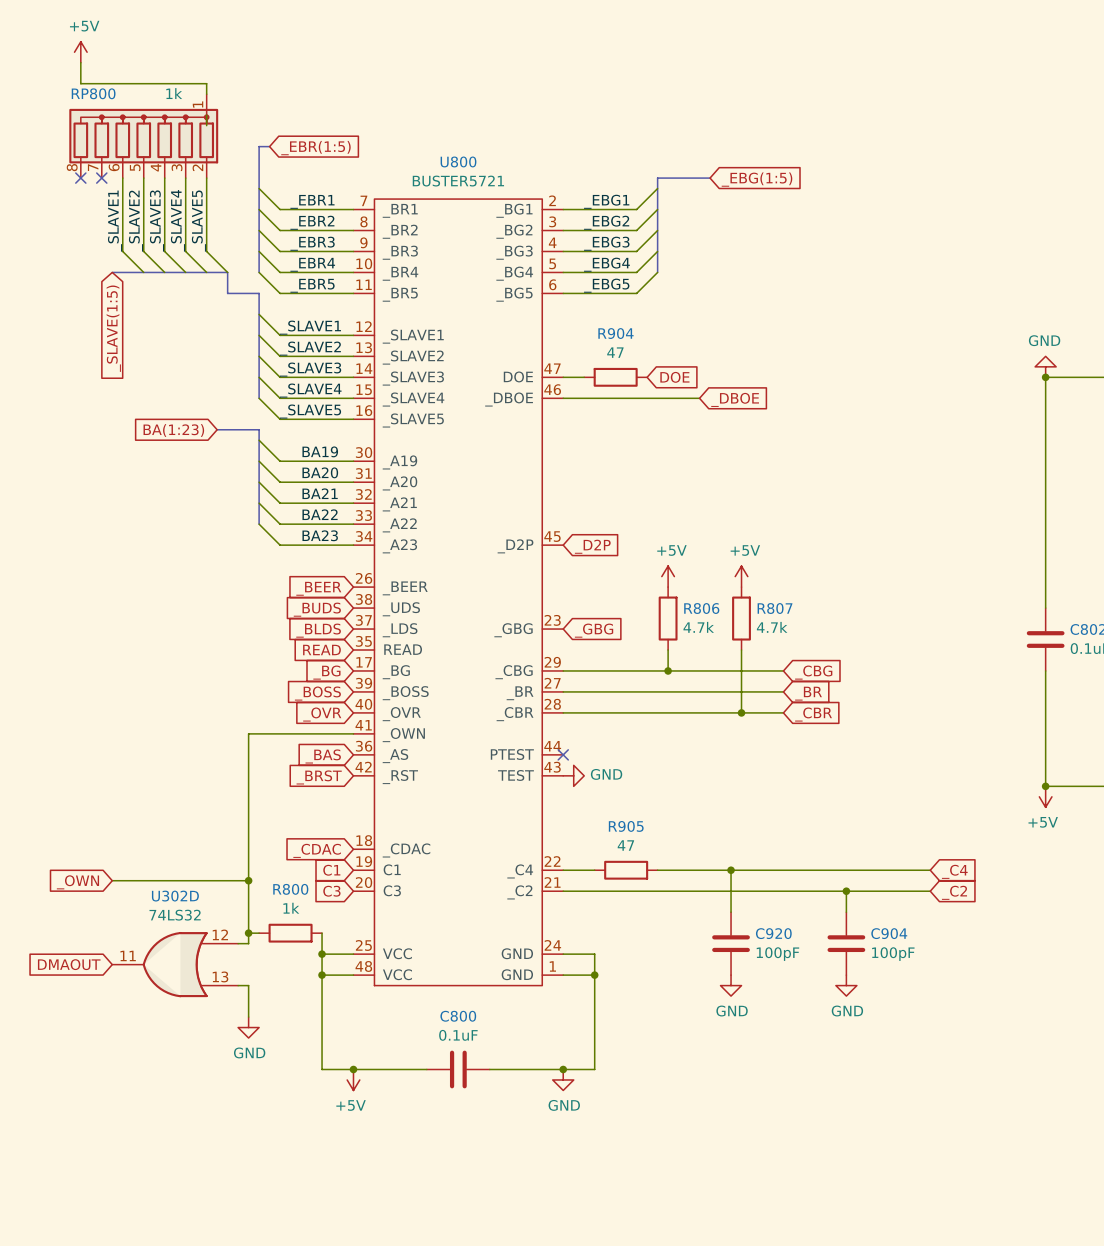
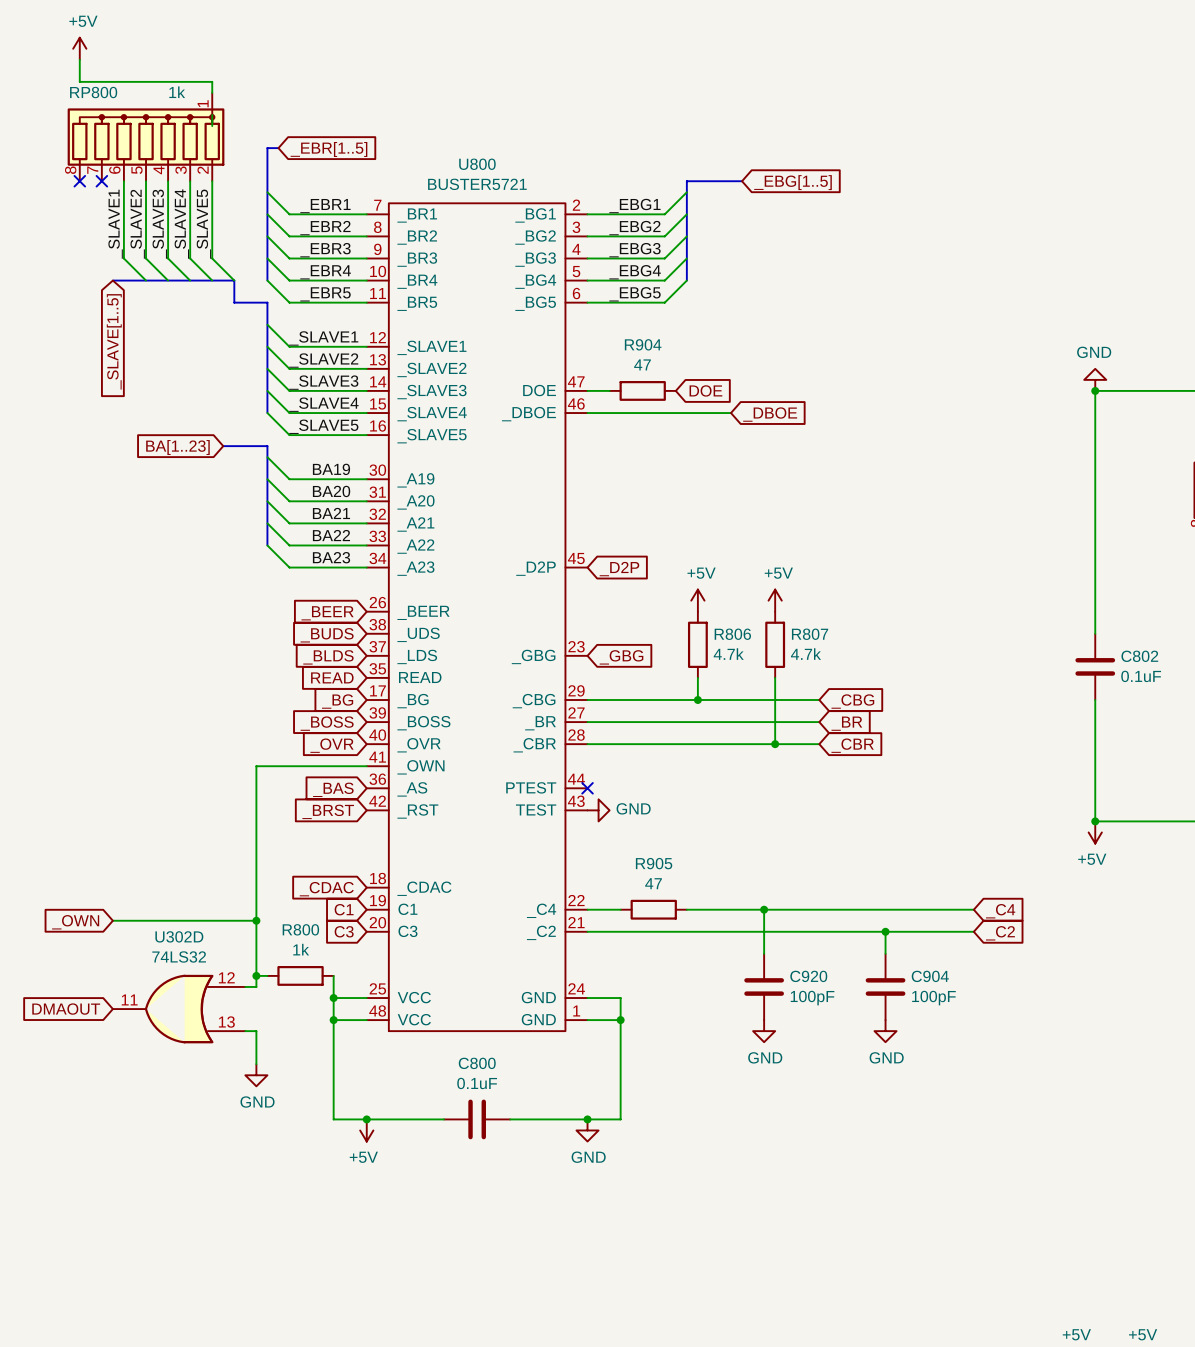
global label: _EBR(1:5) (315, 148) -> _EBR[1..5] (328, 149)
global label: _EBG(1:5) (757, 179) -> _EBG[1..5] (793, 182)
global label: _SLAVE(1:5) (113, 328) -> _SLAVE[1..5] (114, 341)
global label: BA(1:23) (173, 430) -> BA[1..23] (177, 447)

